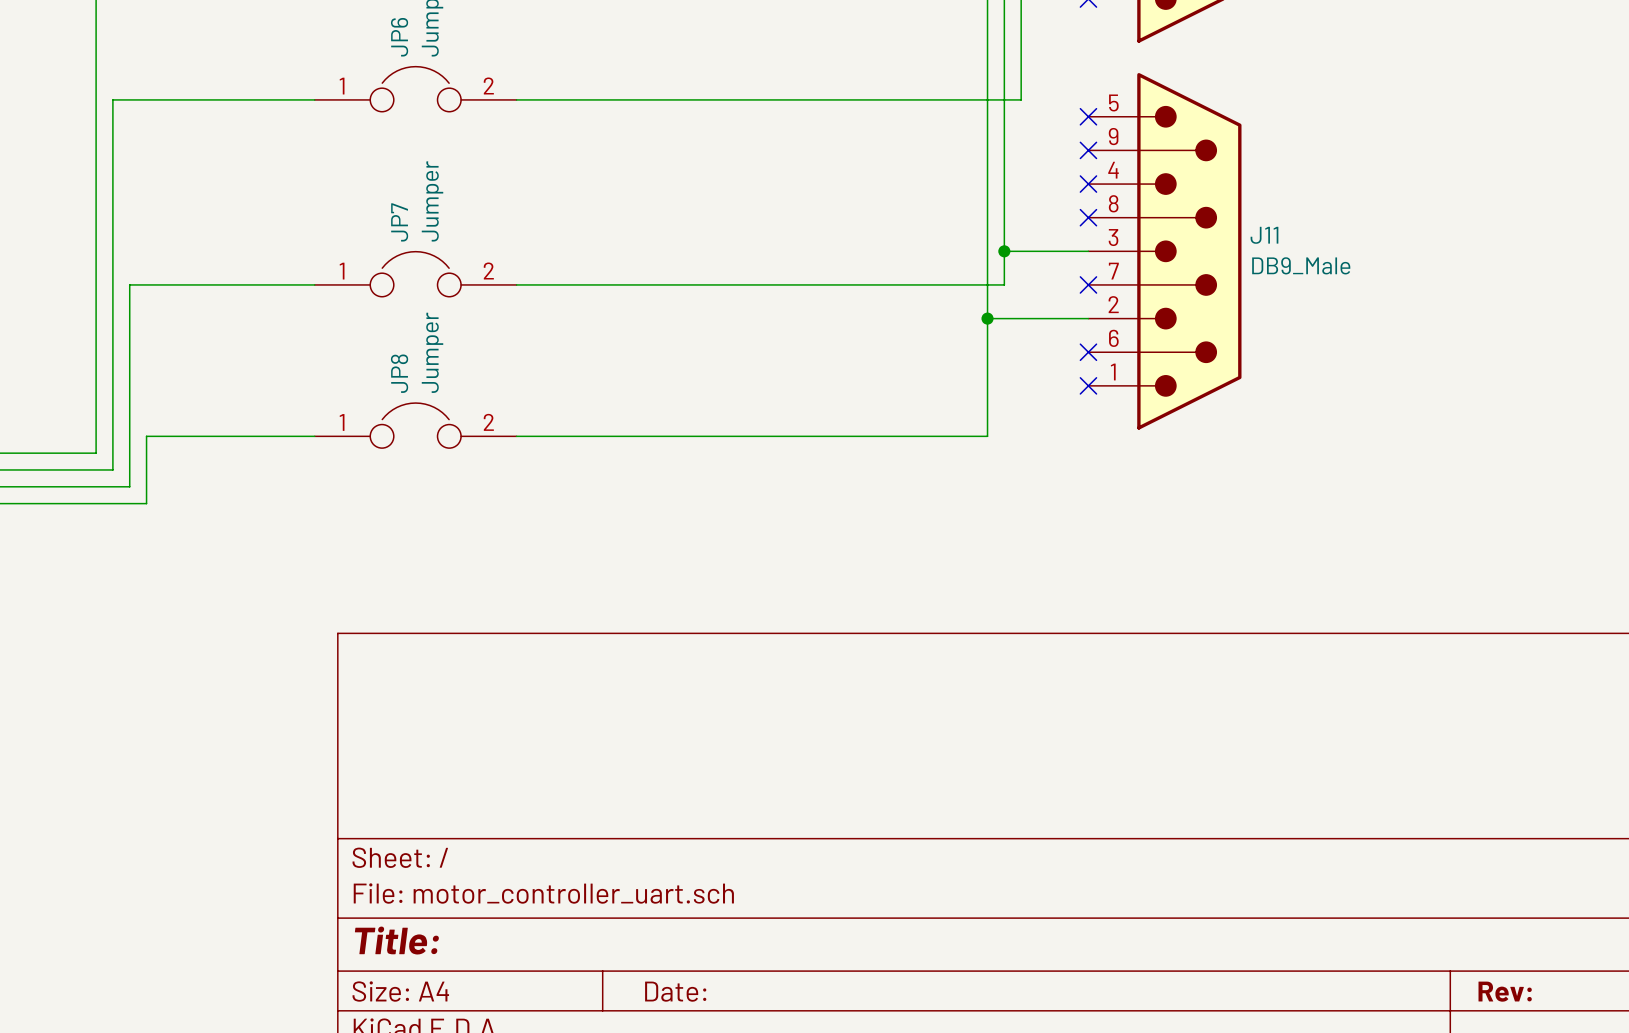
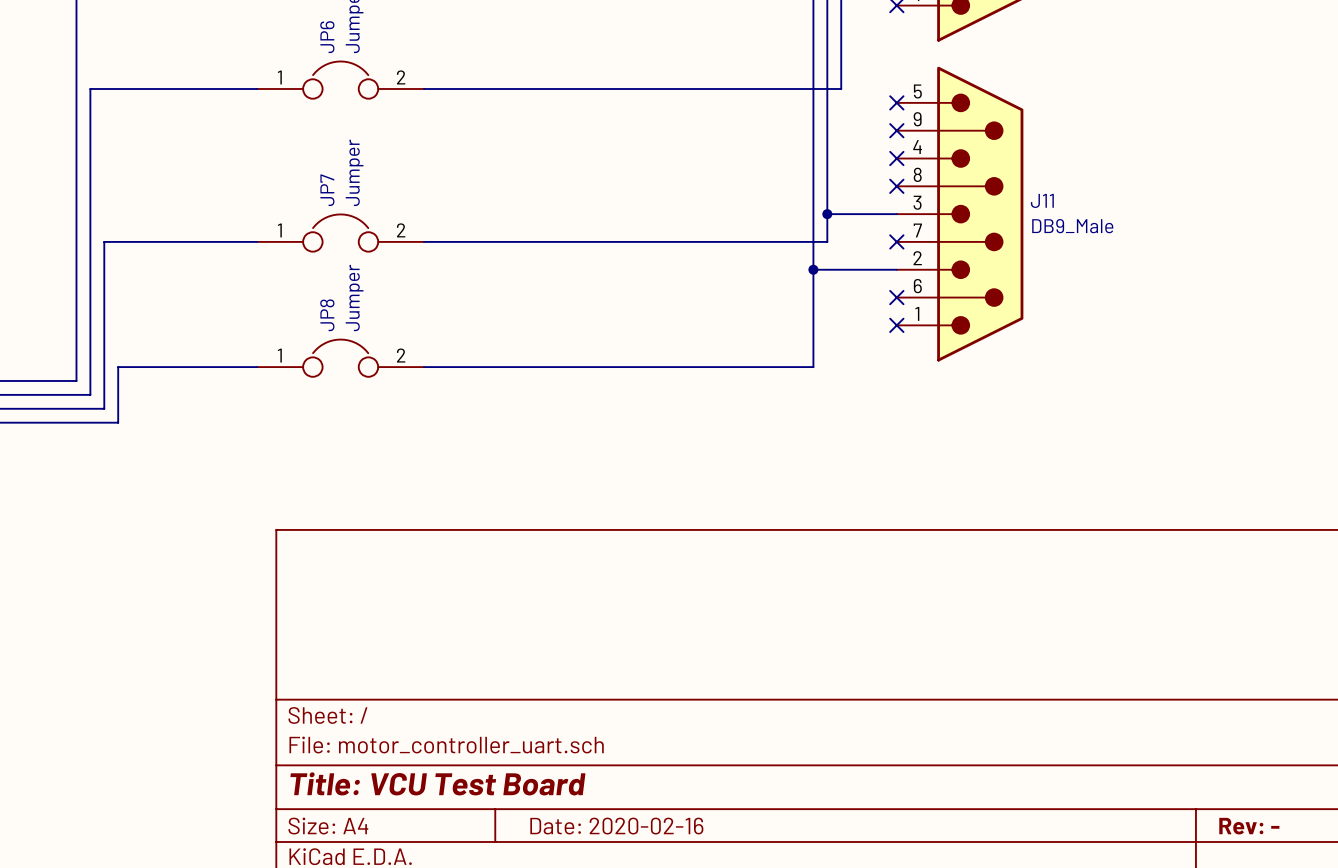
title block: Title: (396, 940) -> Title: VCU Test Board (437, 783)
title block: Date: (675, 991) -> Date: 2020-02-16 (616, 826)
title block: Rev: (1505, 991) -> Rev: - (1249, 826)

